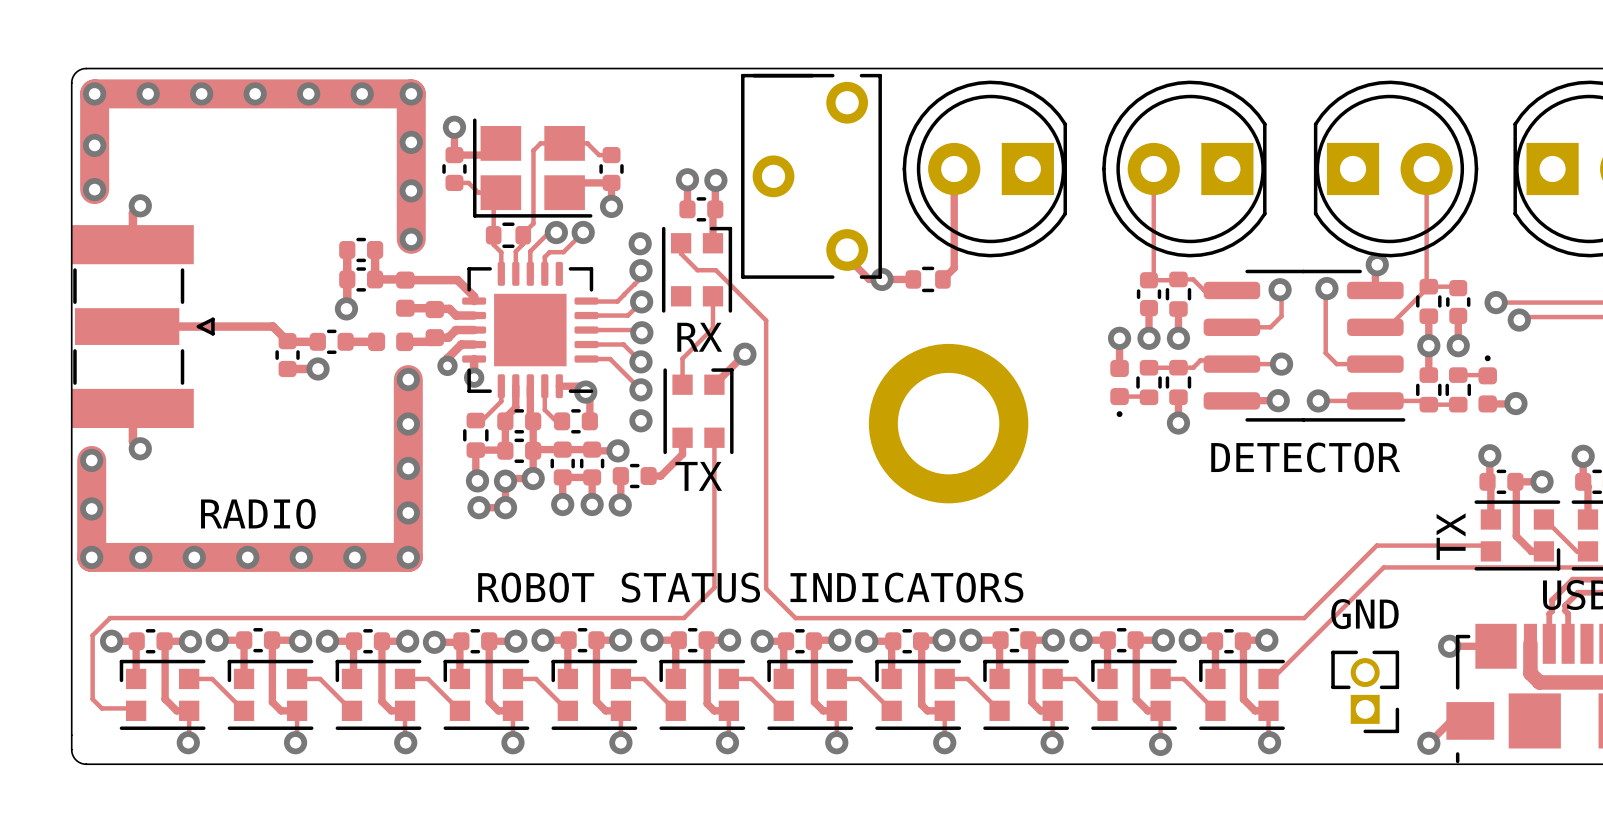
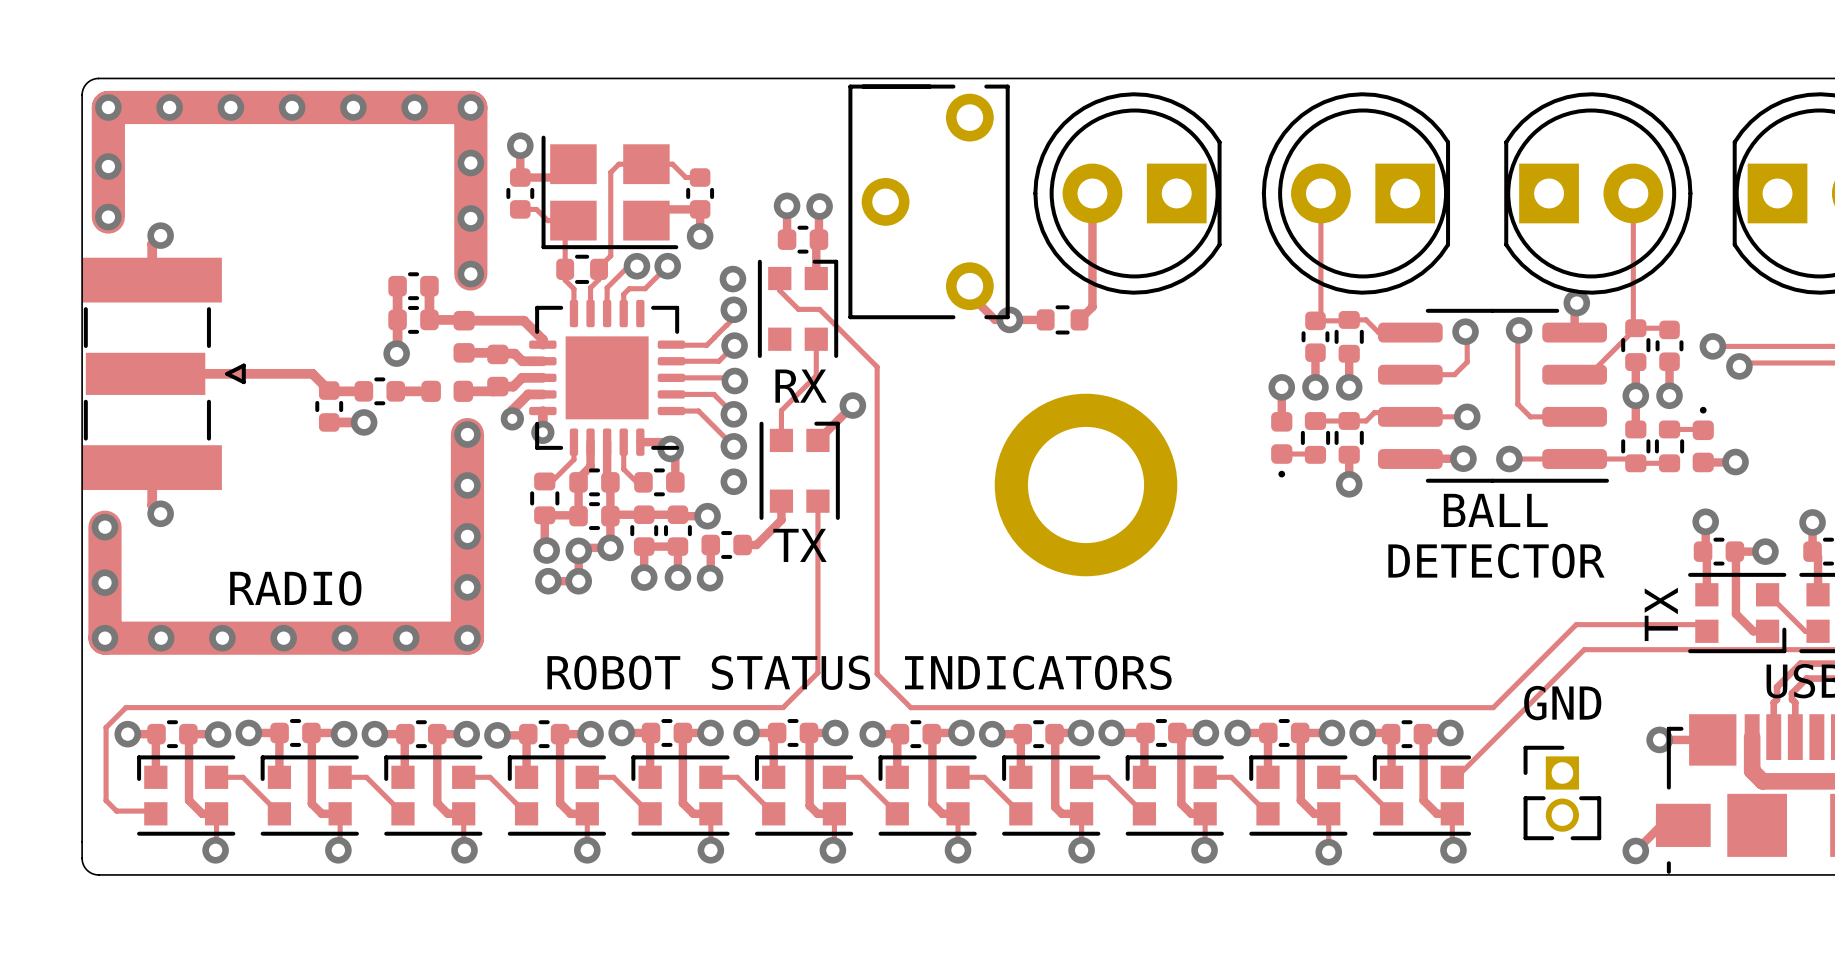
text: DETECTOR (1305, 457) -> BALL (1495, 510)
text: none -> DETECTOR (1496, 561)
part rotation: 0° (1365, 691) -> 180° (1562, 792)

